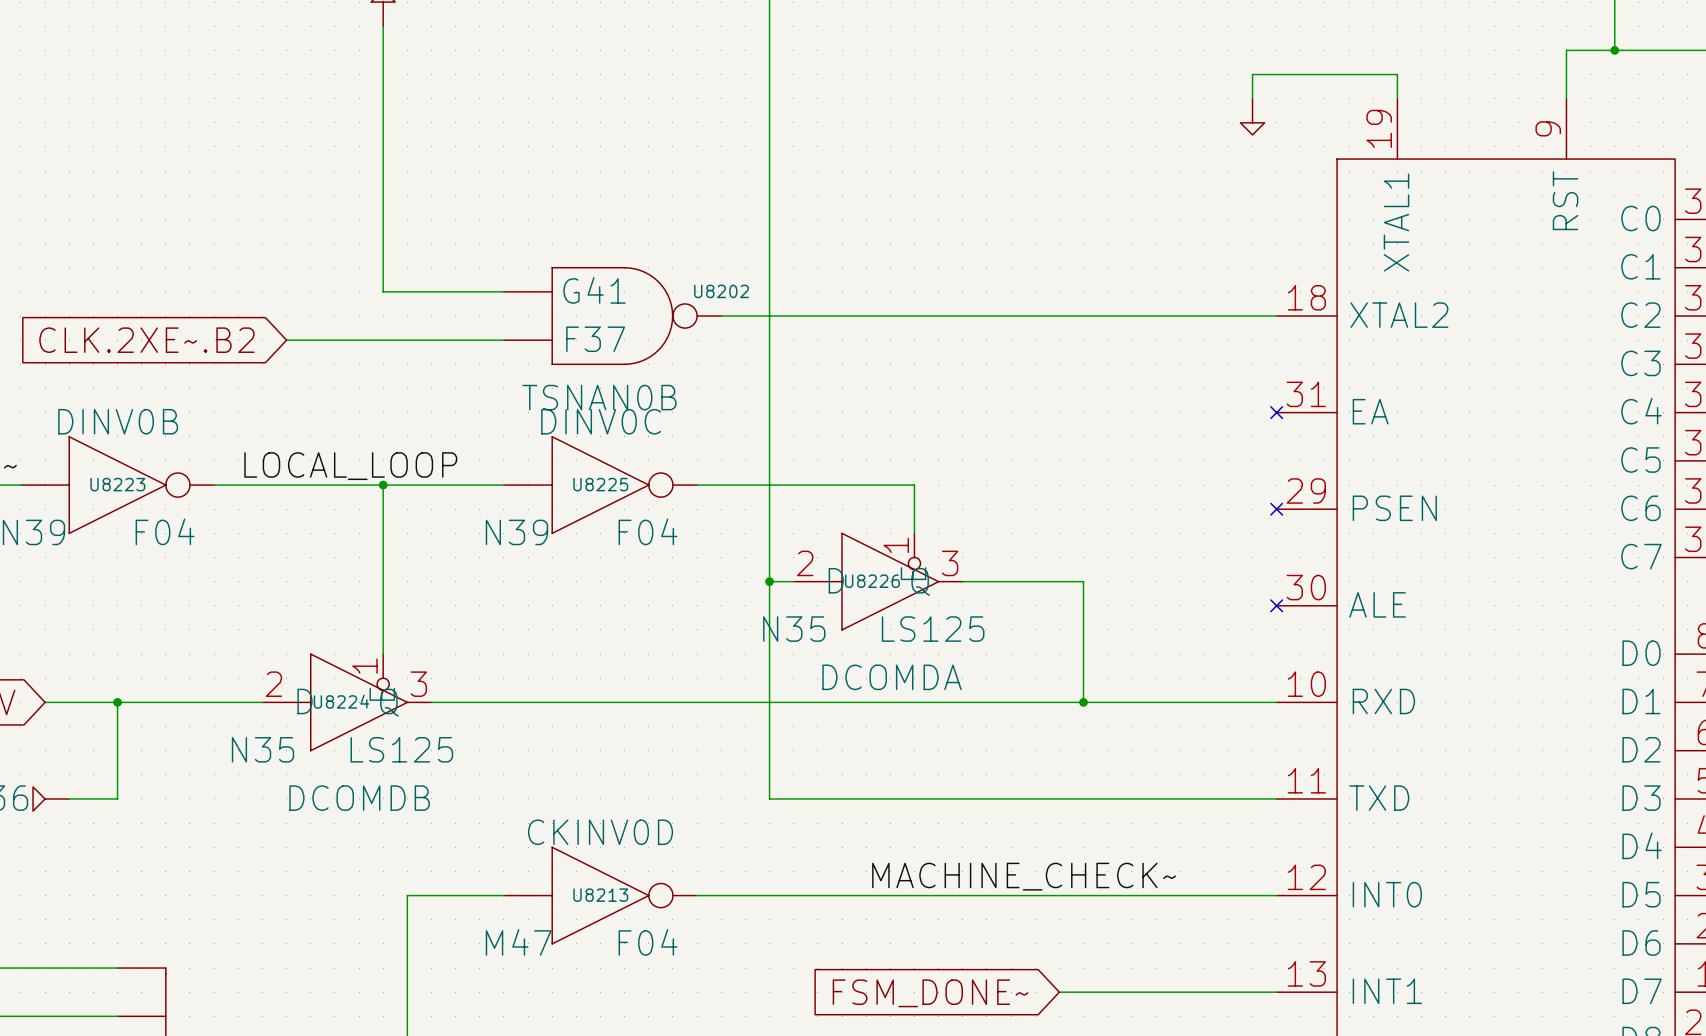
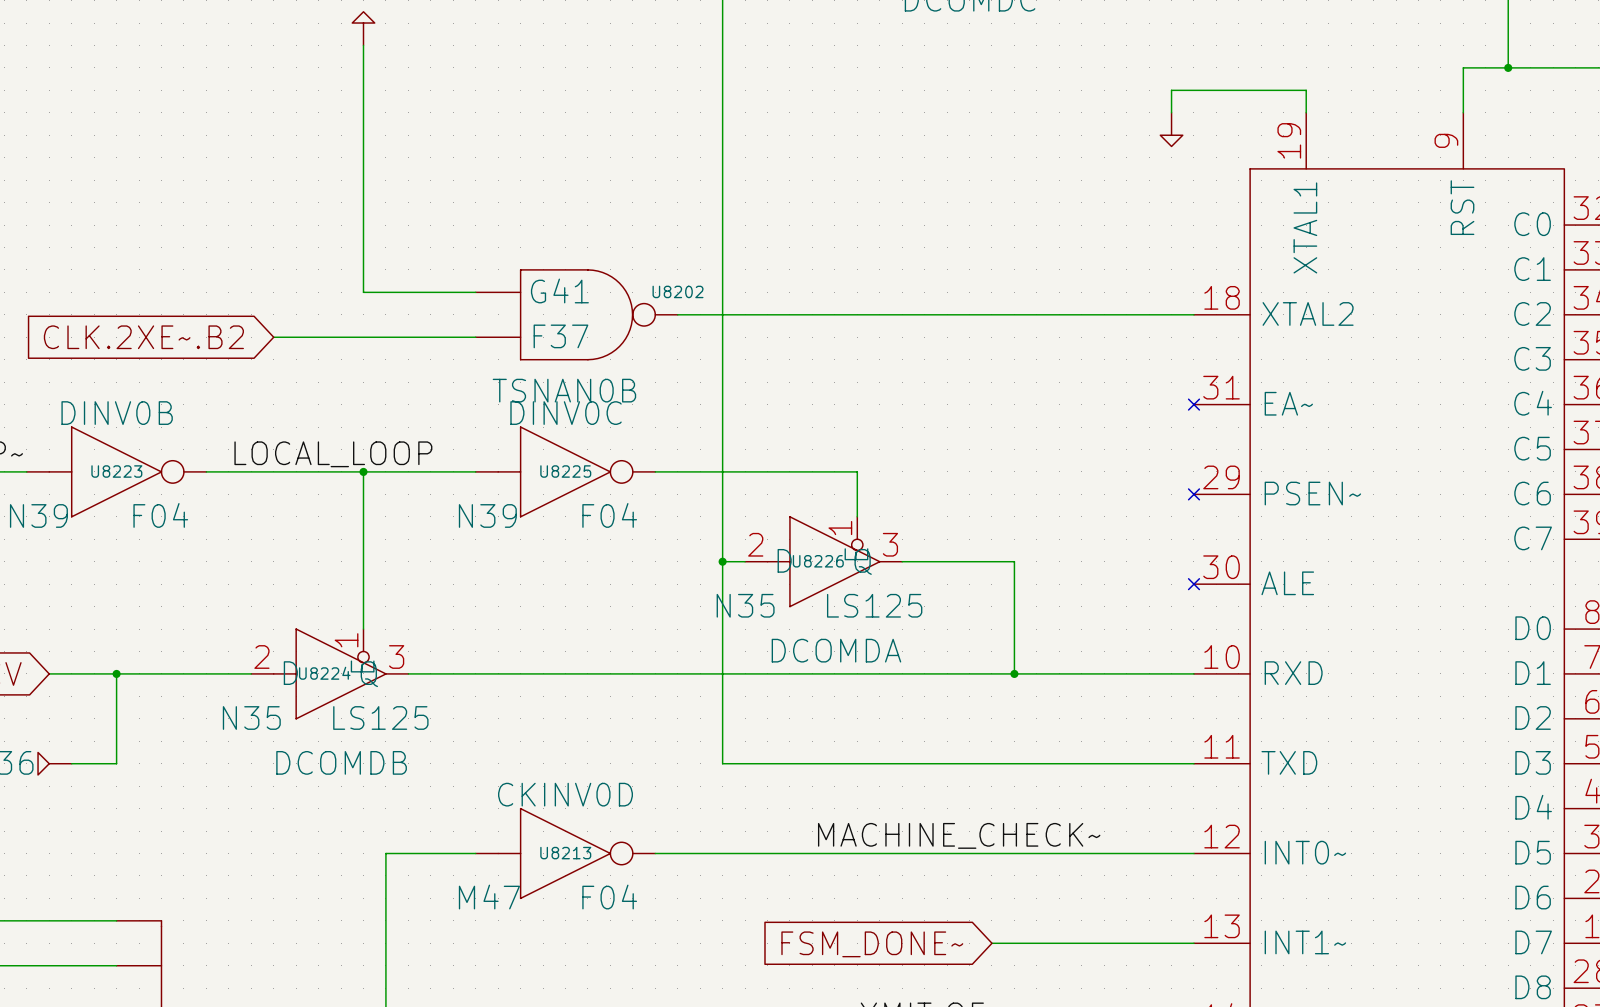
part pin name: EA (1370, 411) -> EA~ (1288, 403)
part pin name: PSEN (1394, 508) -> PSEN~ (1312, 493)
part pin name: INT0 (1387, 894) -> INT0~ (1305, 852)
part pin name: INT1 (1387, 991) -> INT1~ (1305, 942)

